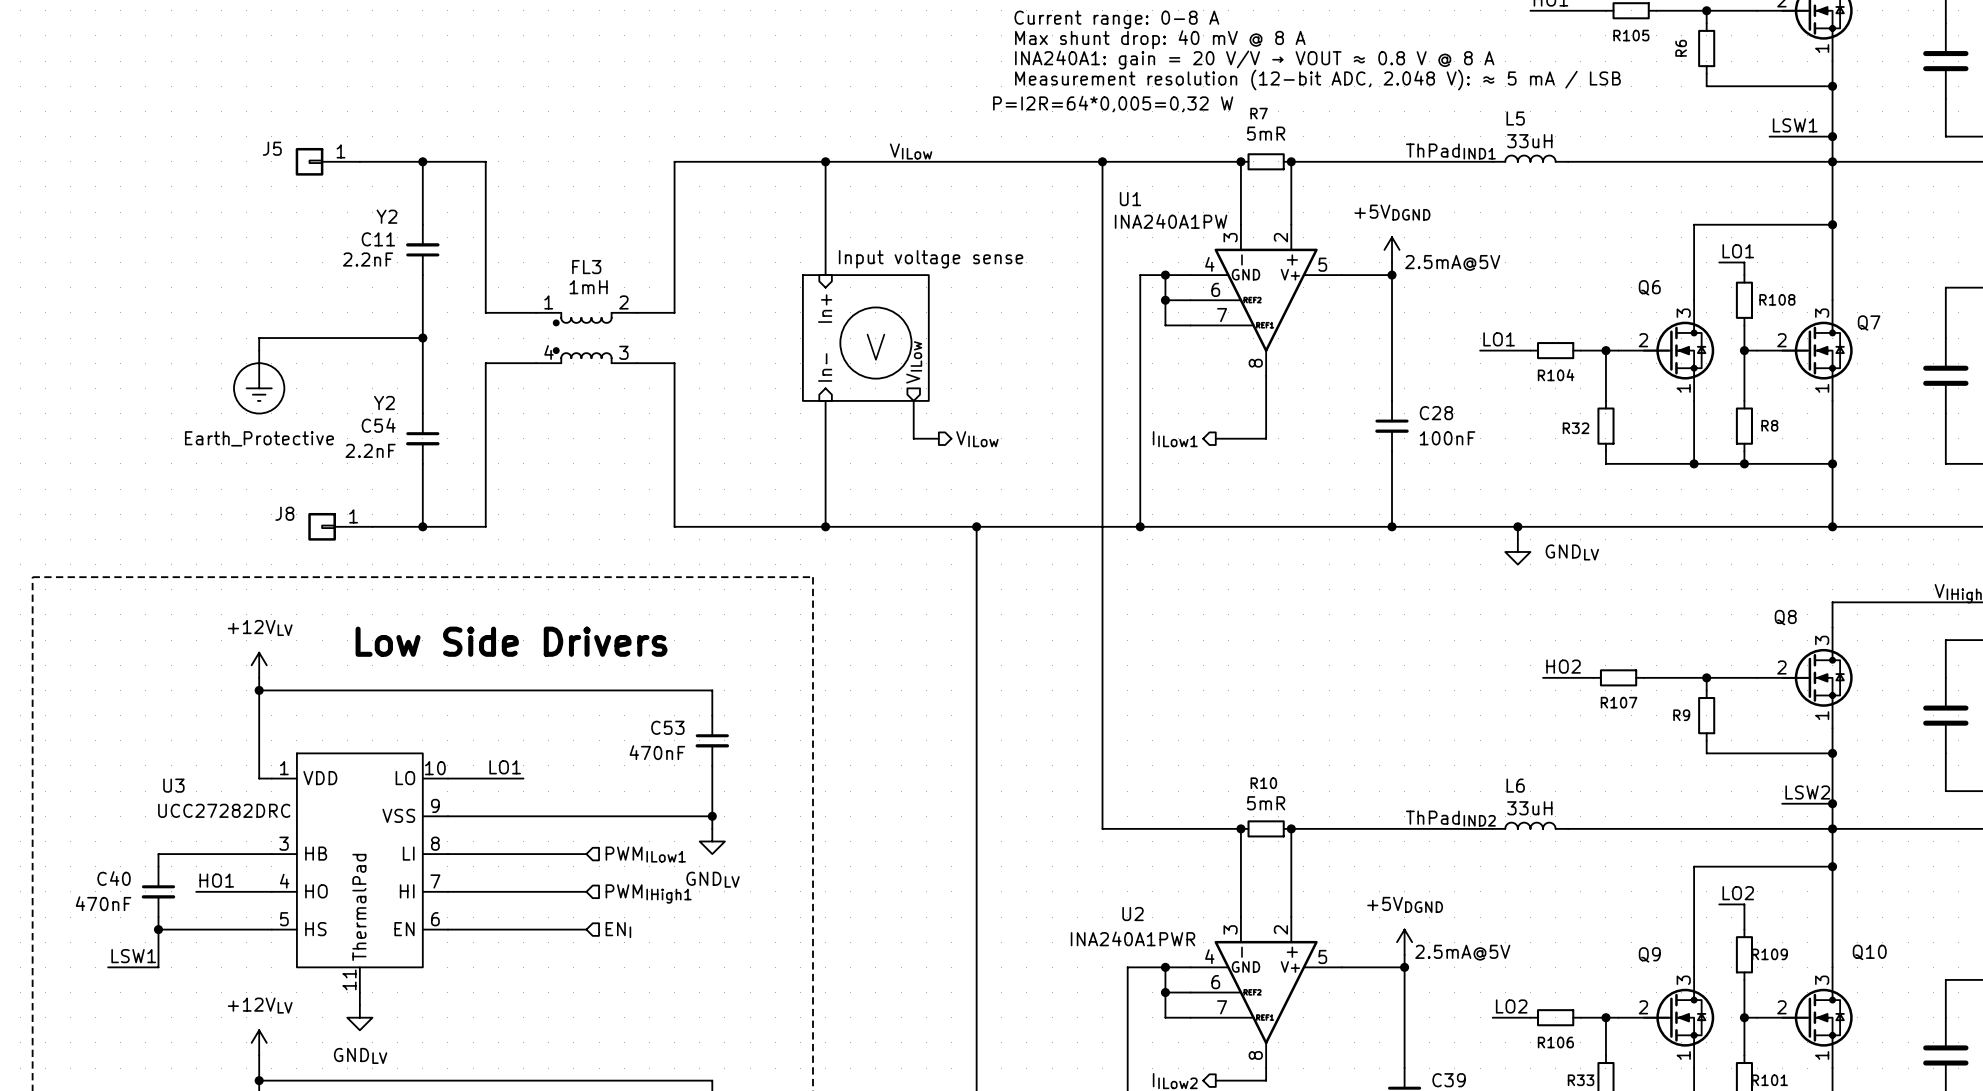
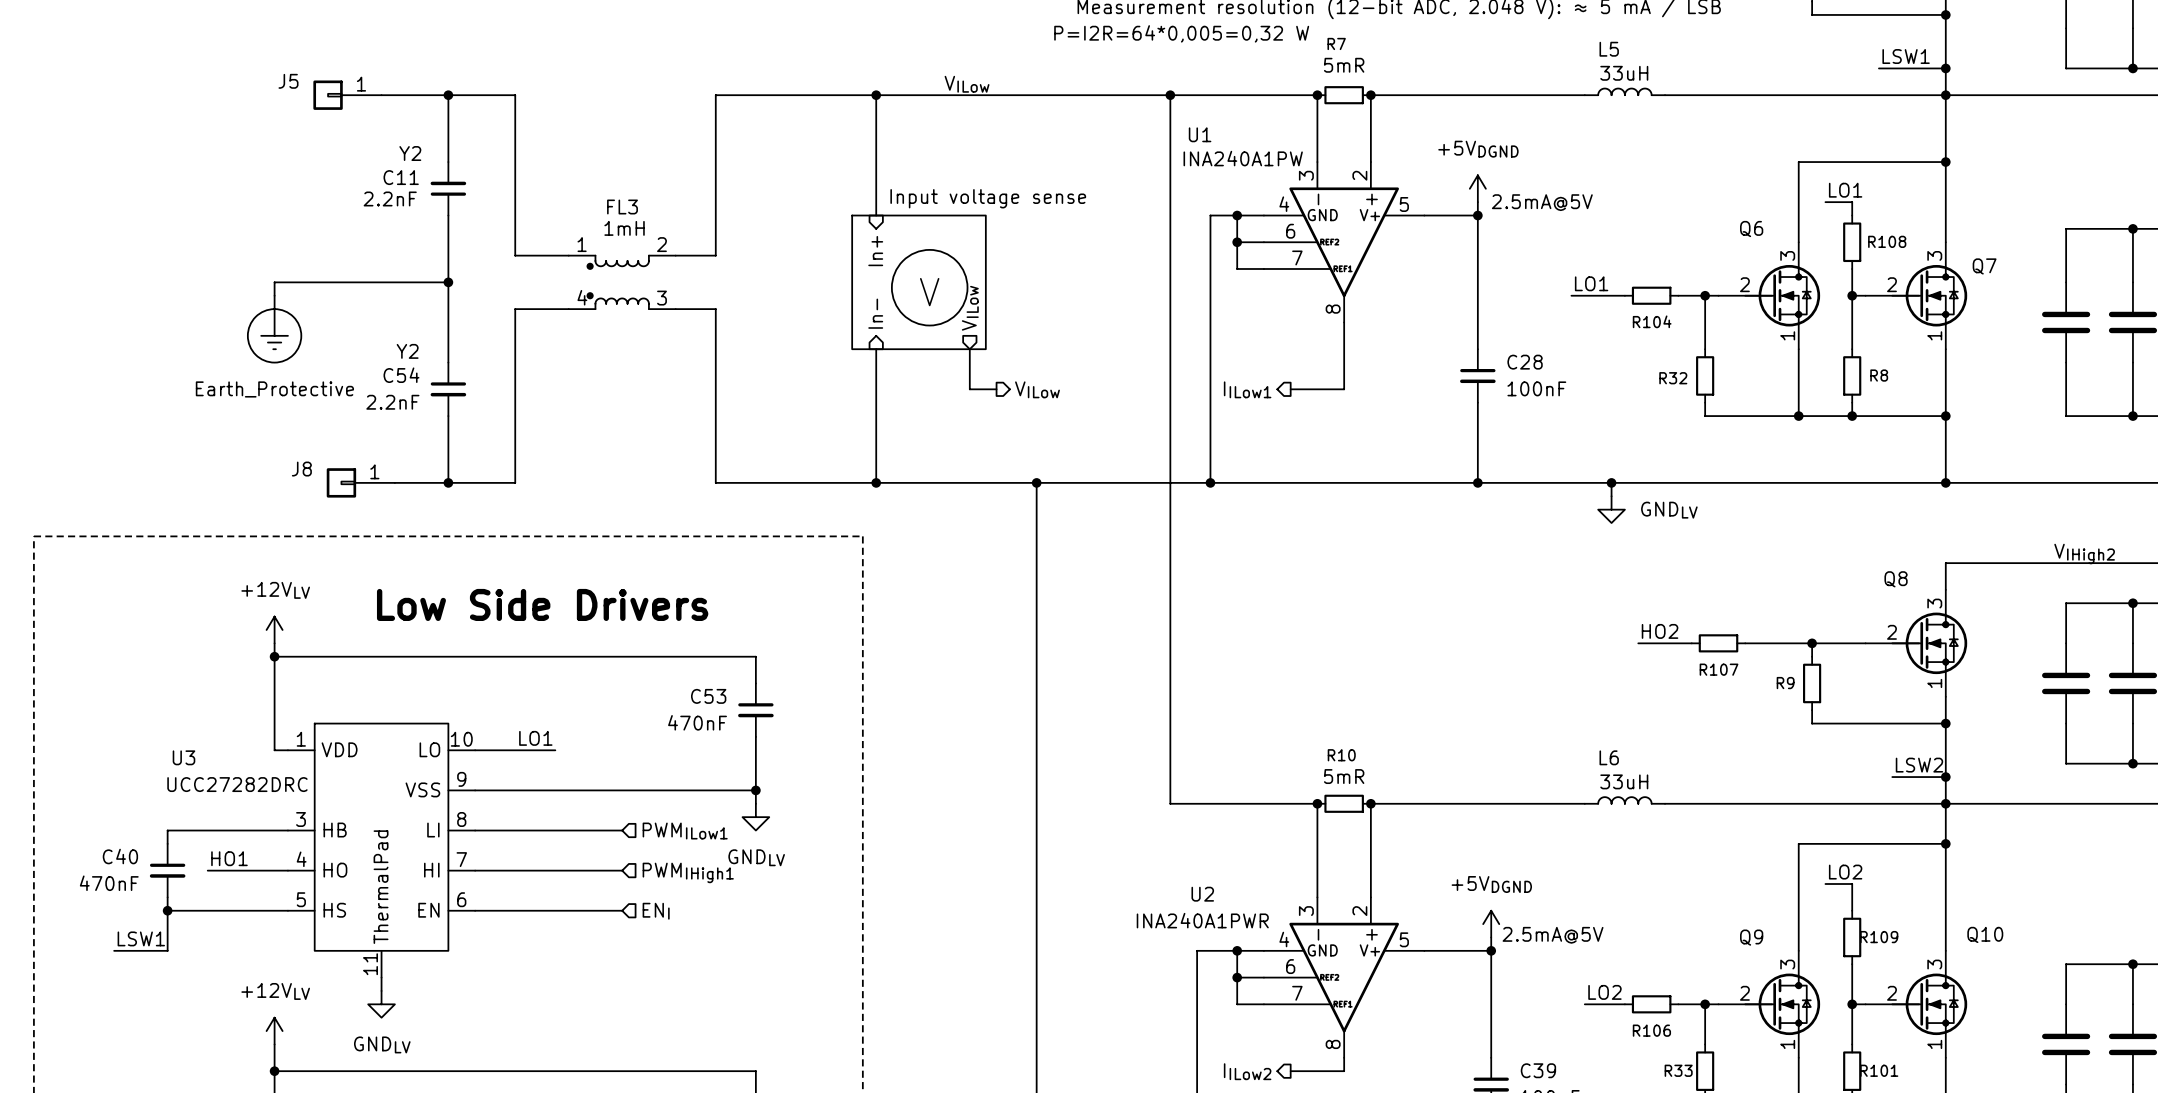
label: ThPadIND1 (1450, 151) -> none
label: ThPadIND2 (1450, 818) -> none

